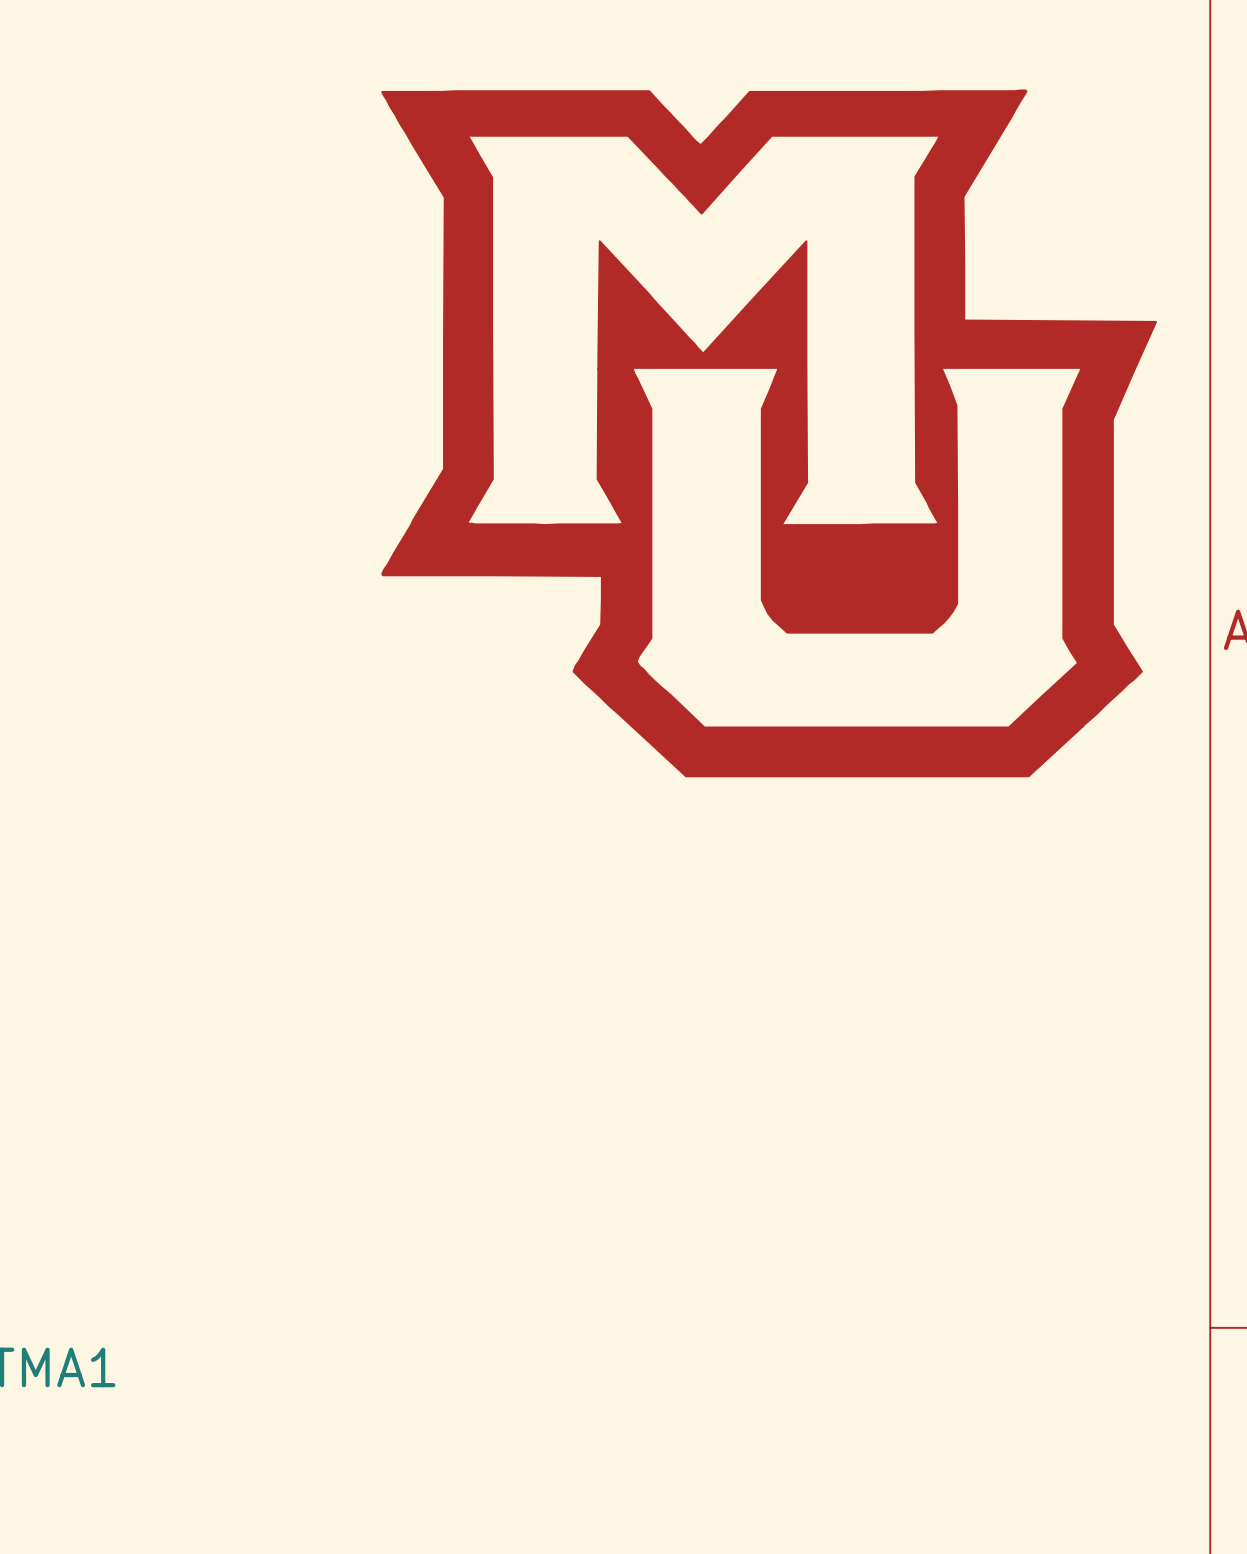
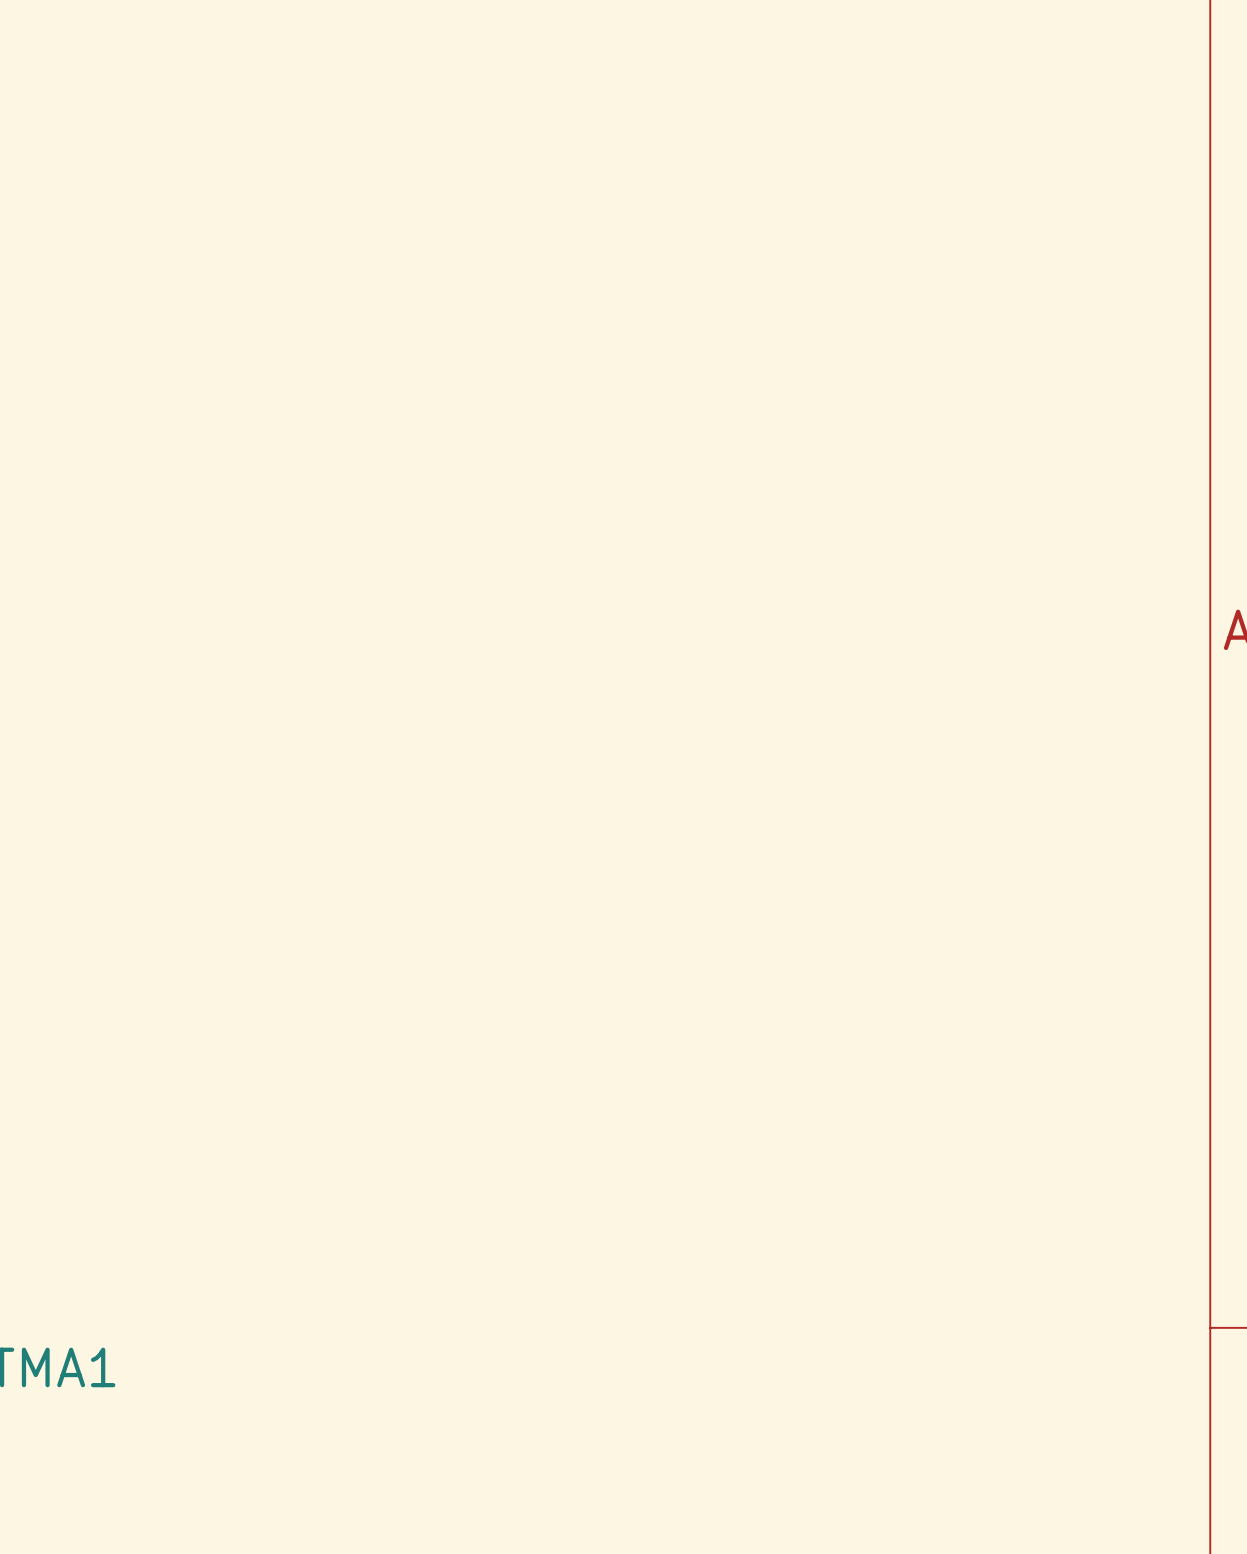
power symbol: (769, 433) -> none

